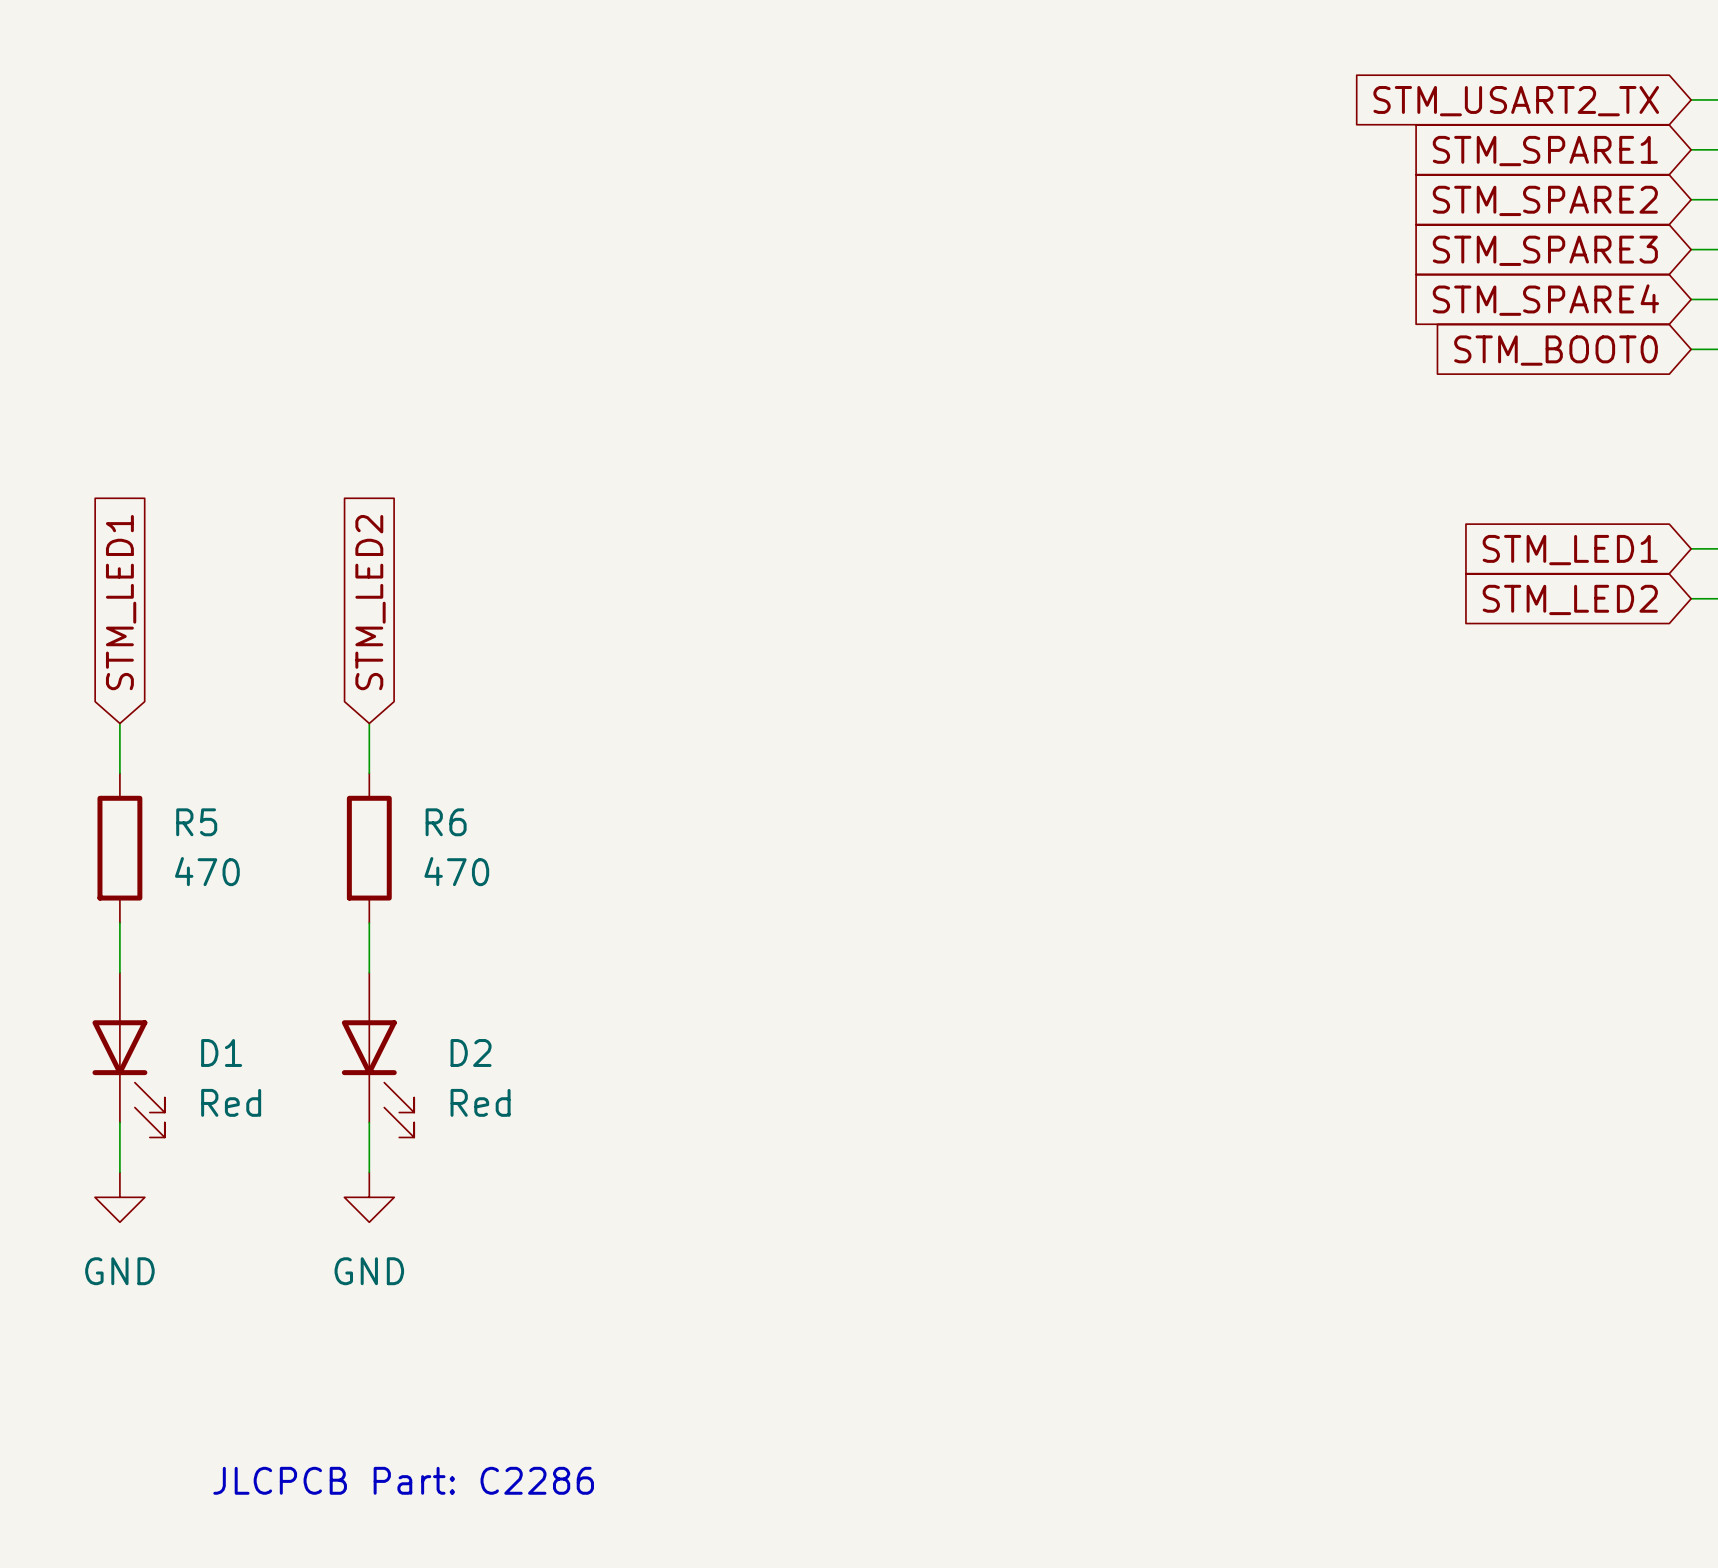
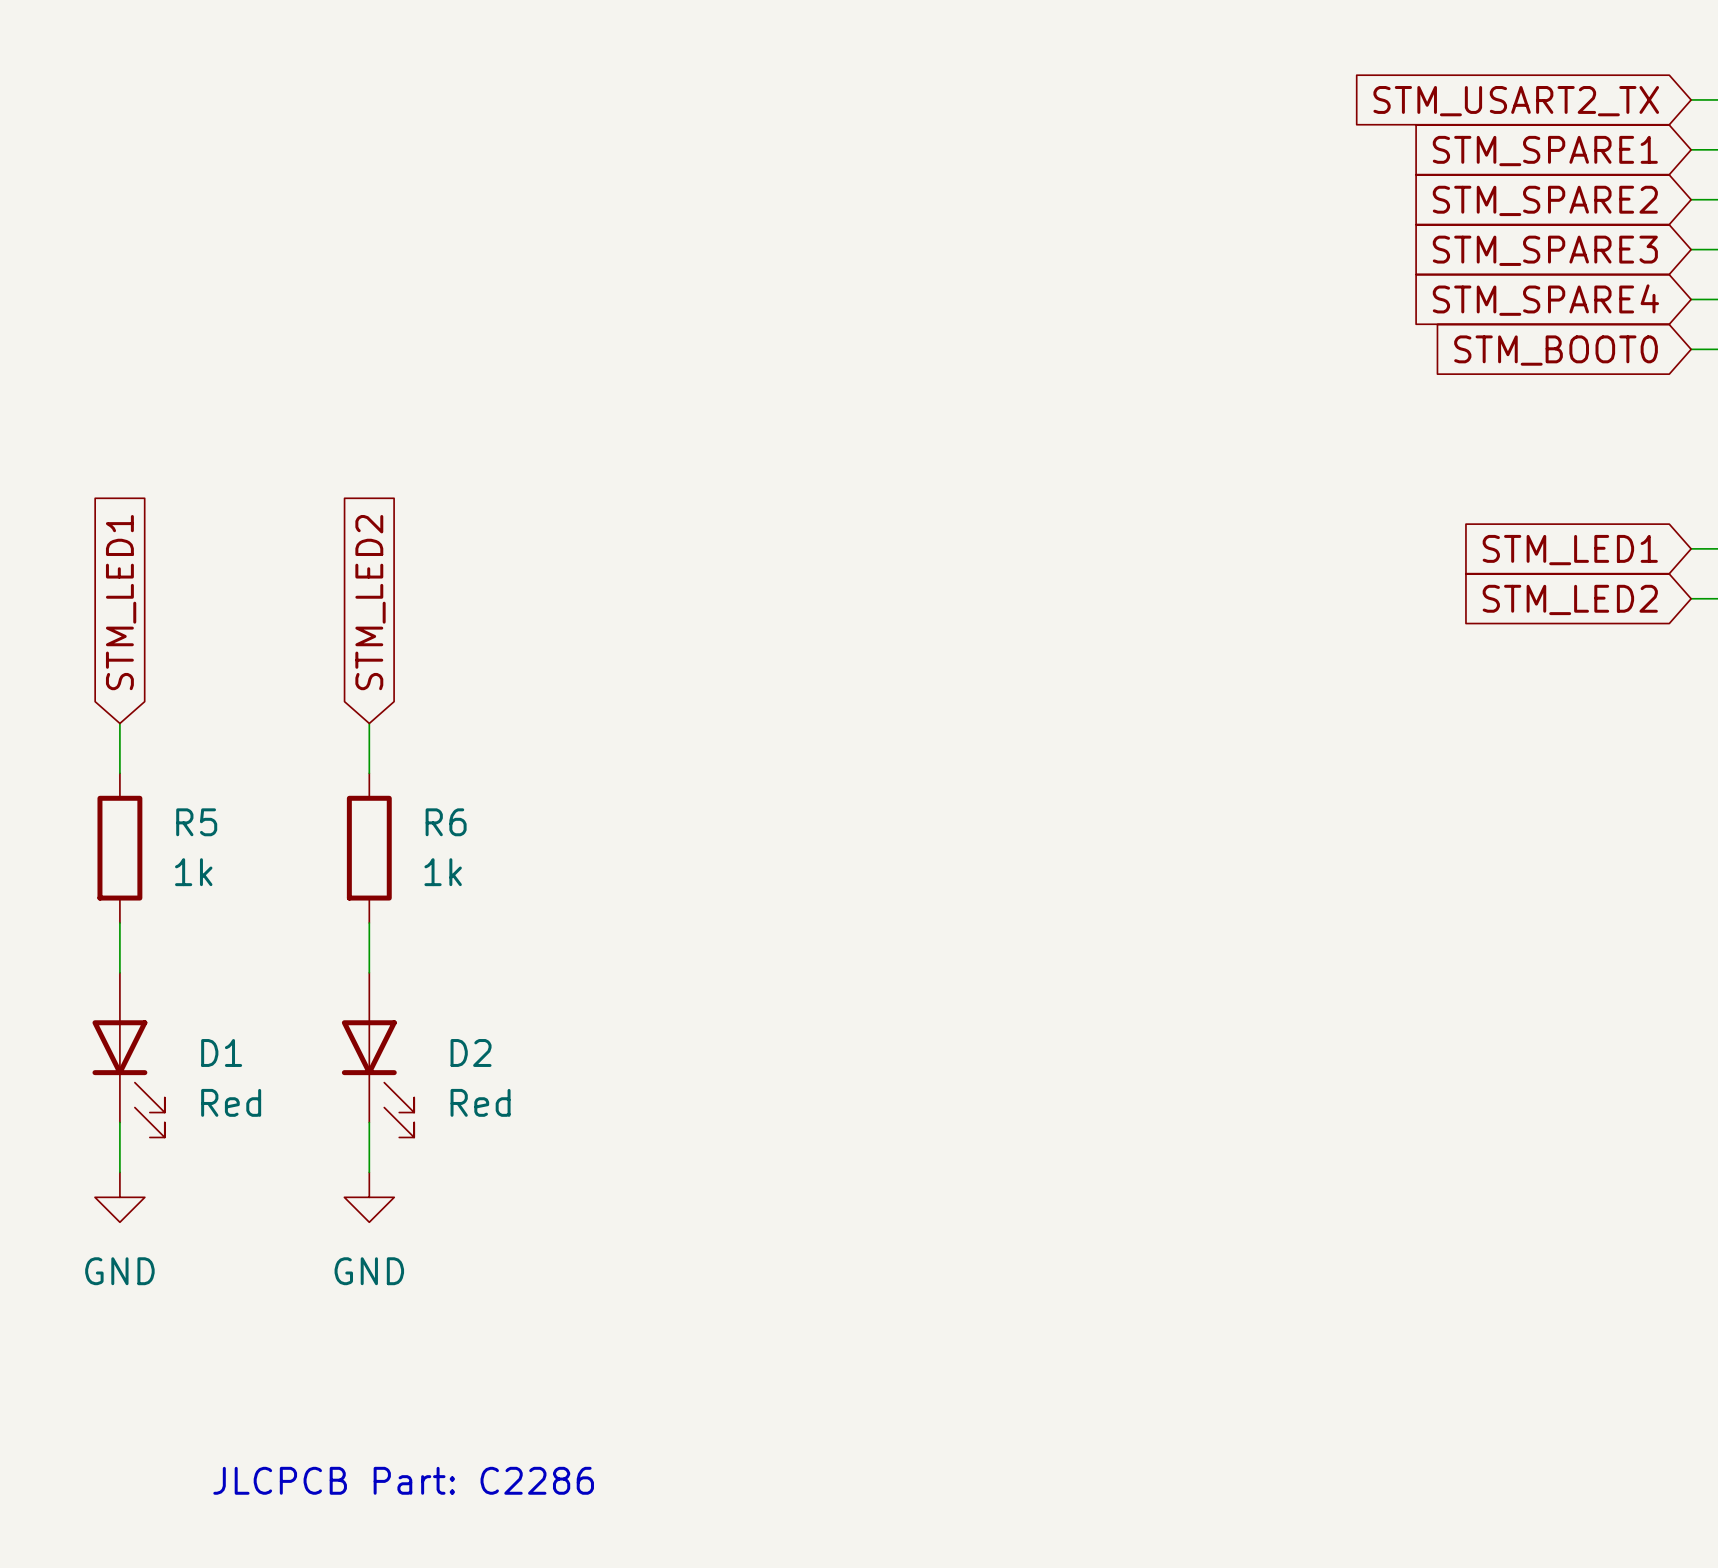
R5 value: 470 (207, 871) -> 1k (193, 872)
R6 value: 470 (456, 871) -> 1k (443, 872)

